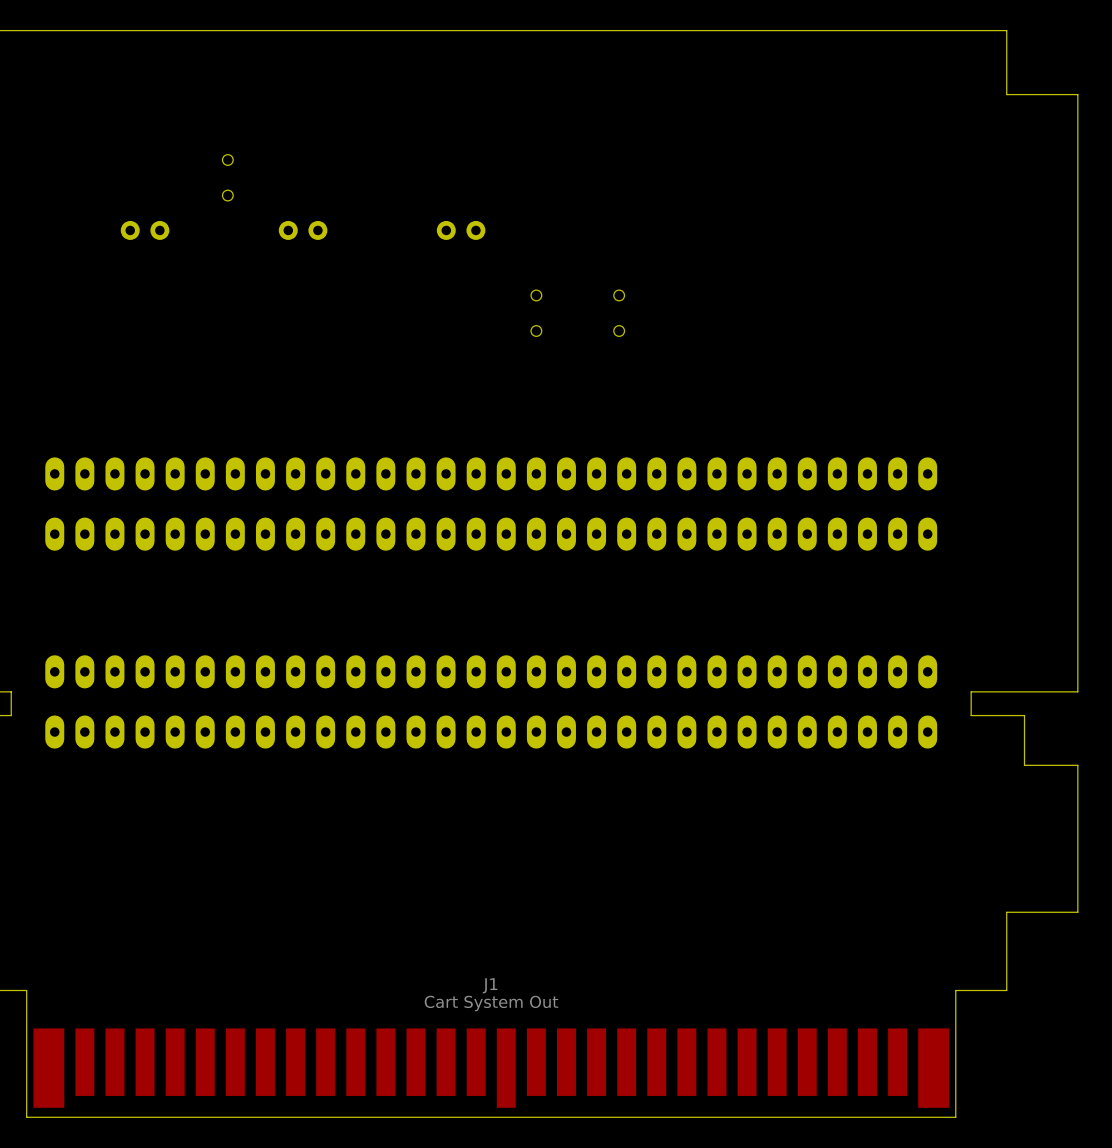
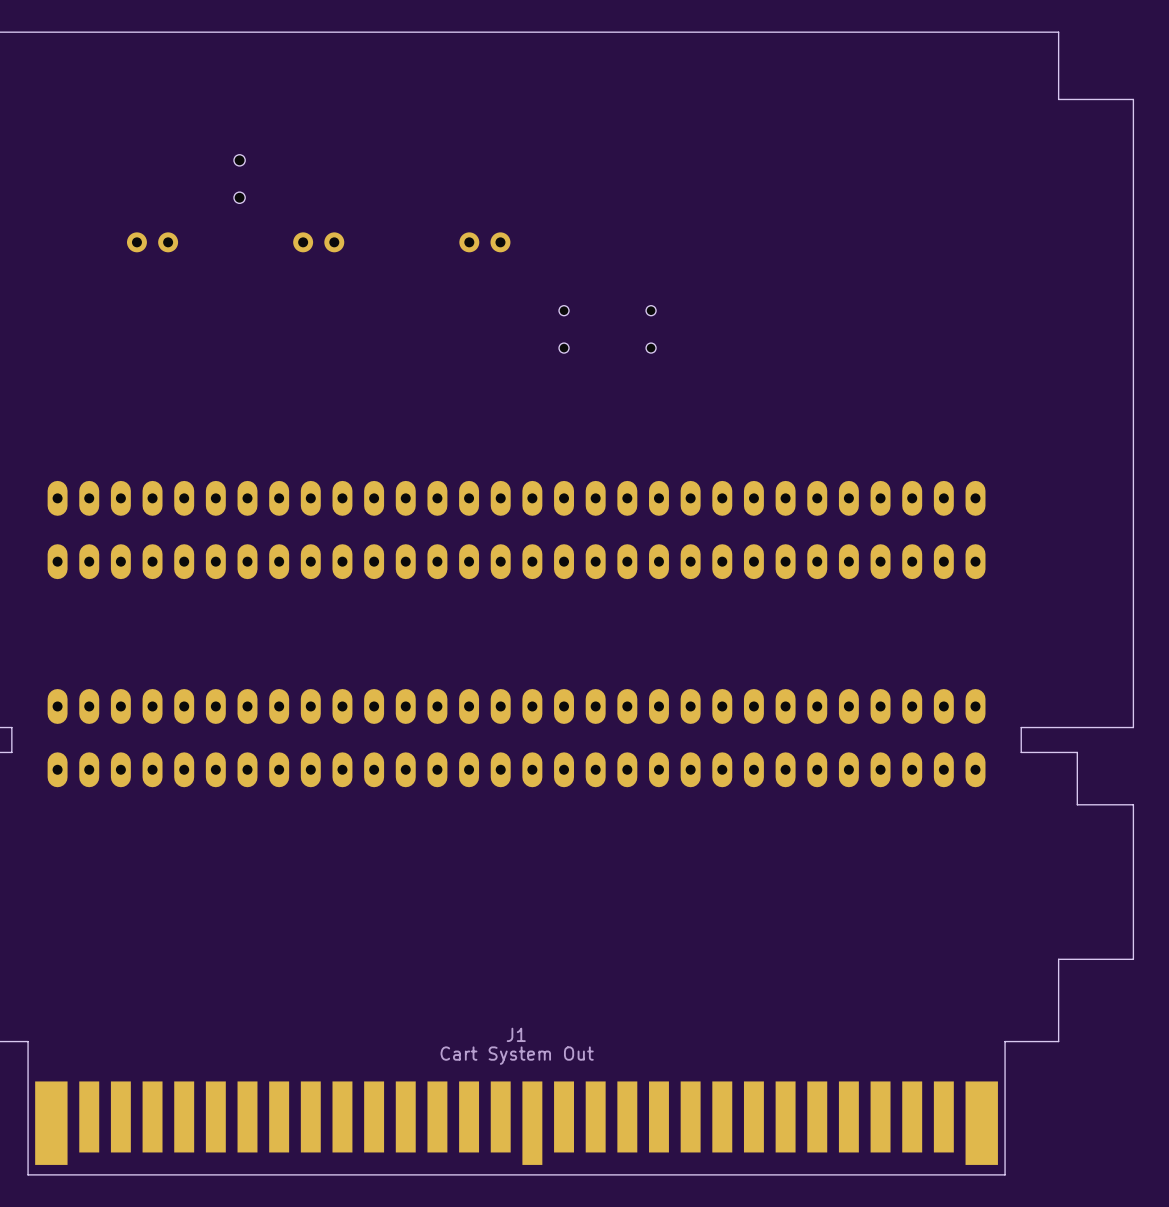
part footprint: [222, 154, 234, 202] -> [233, 154, 246, 204]
part footprint: [530, 289, 543, 337] -> [559, 305, 570, 354]
part footprint: [613, 289, 625, 337] -> [646, 305, 657, 354]

